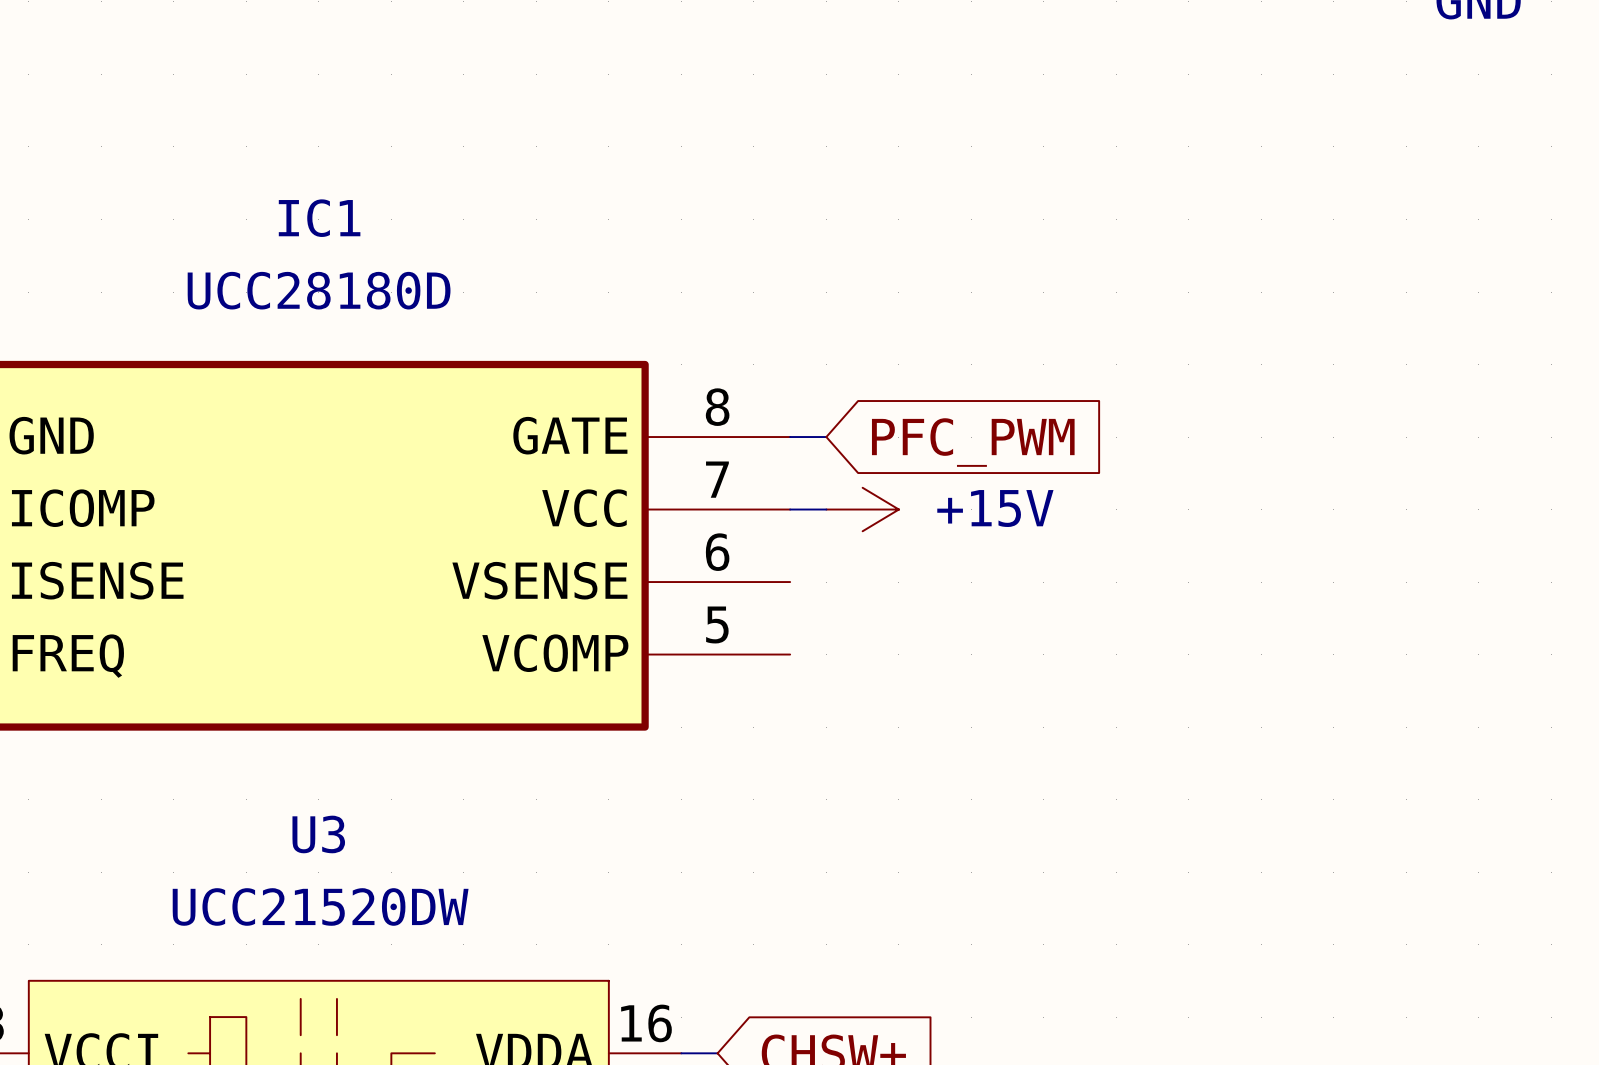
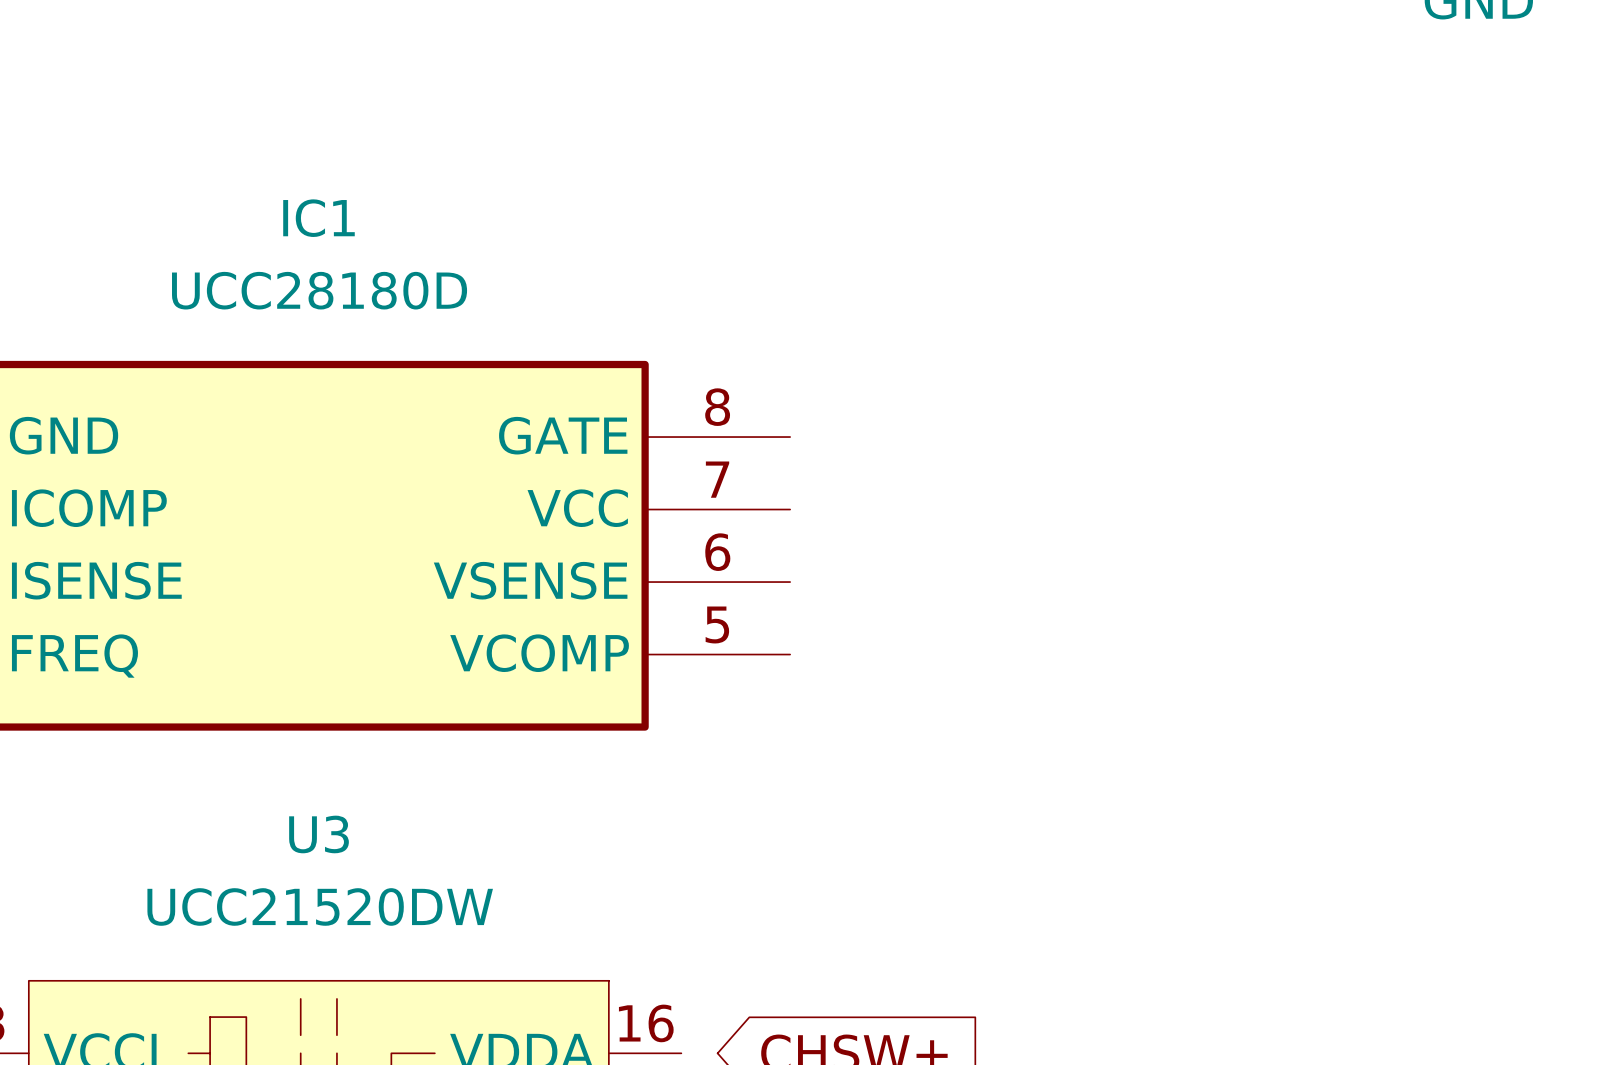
wire: (790, 437) (826, 437) -> none
global label: PFC_PWM (973, 442) -> none
wire: (790, 509) (826, 509) -> none
power symbol: +15V (862, 509) -> none
wire: (681, 1053) (717, 1053) -> none

